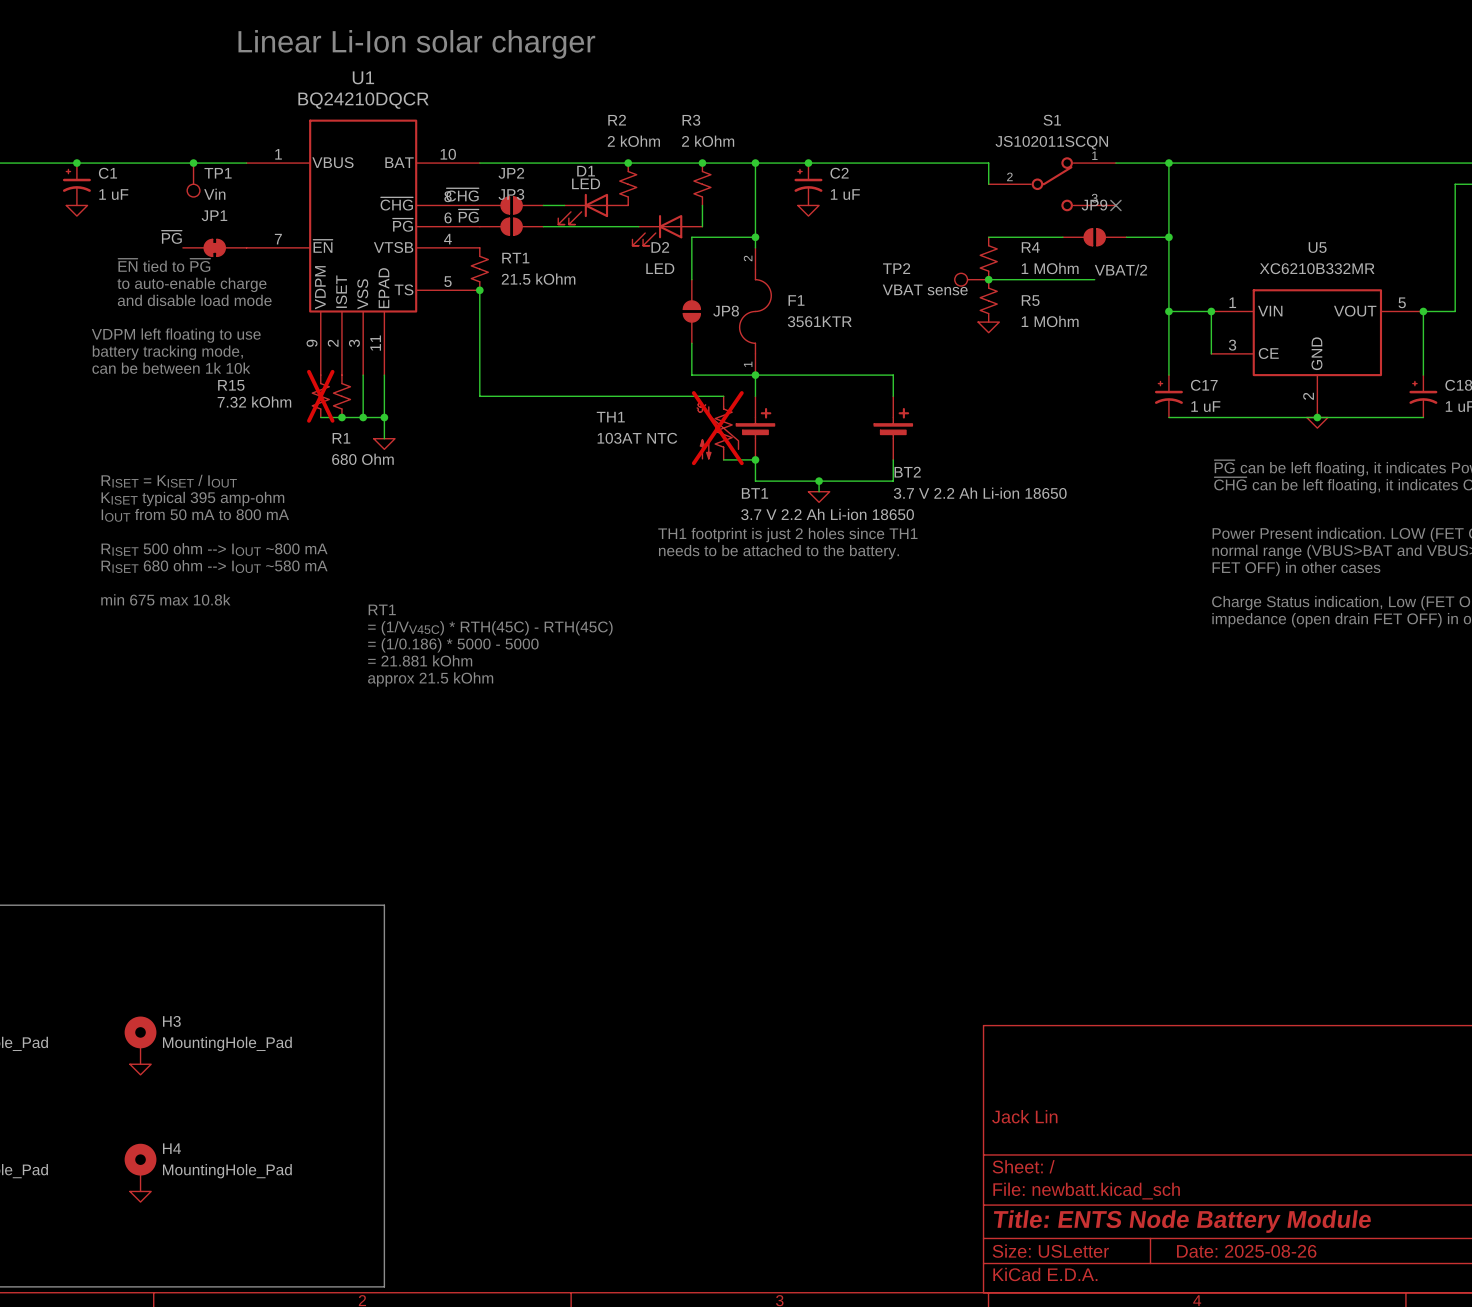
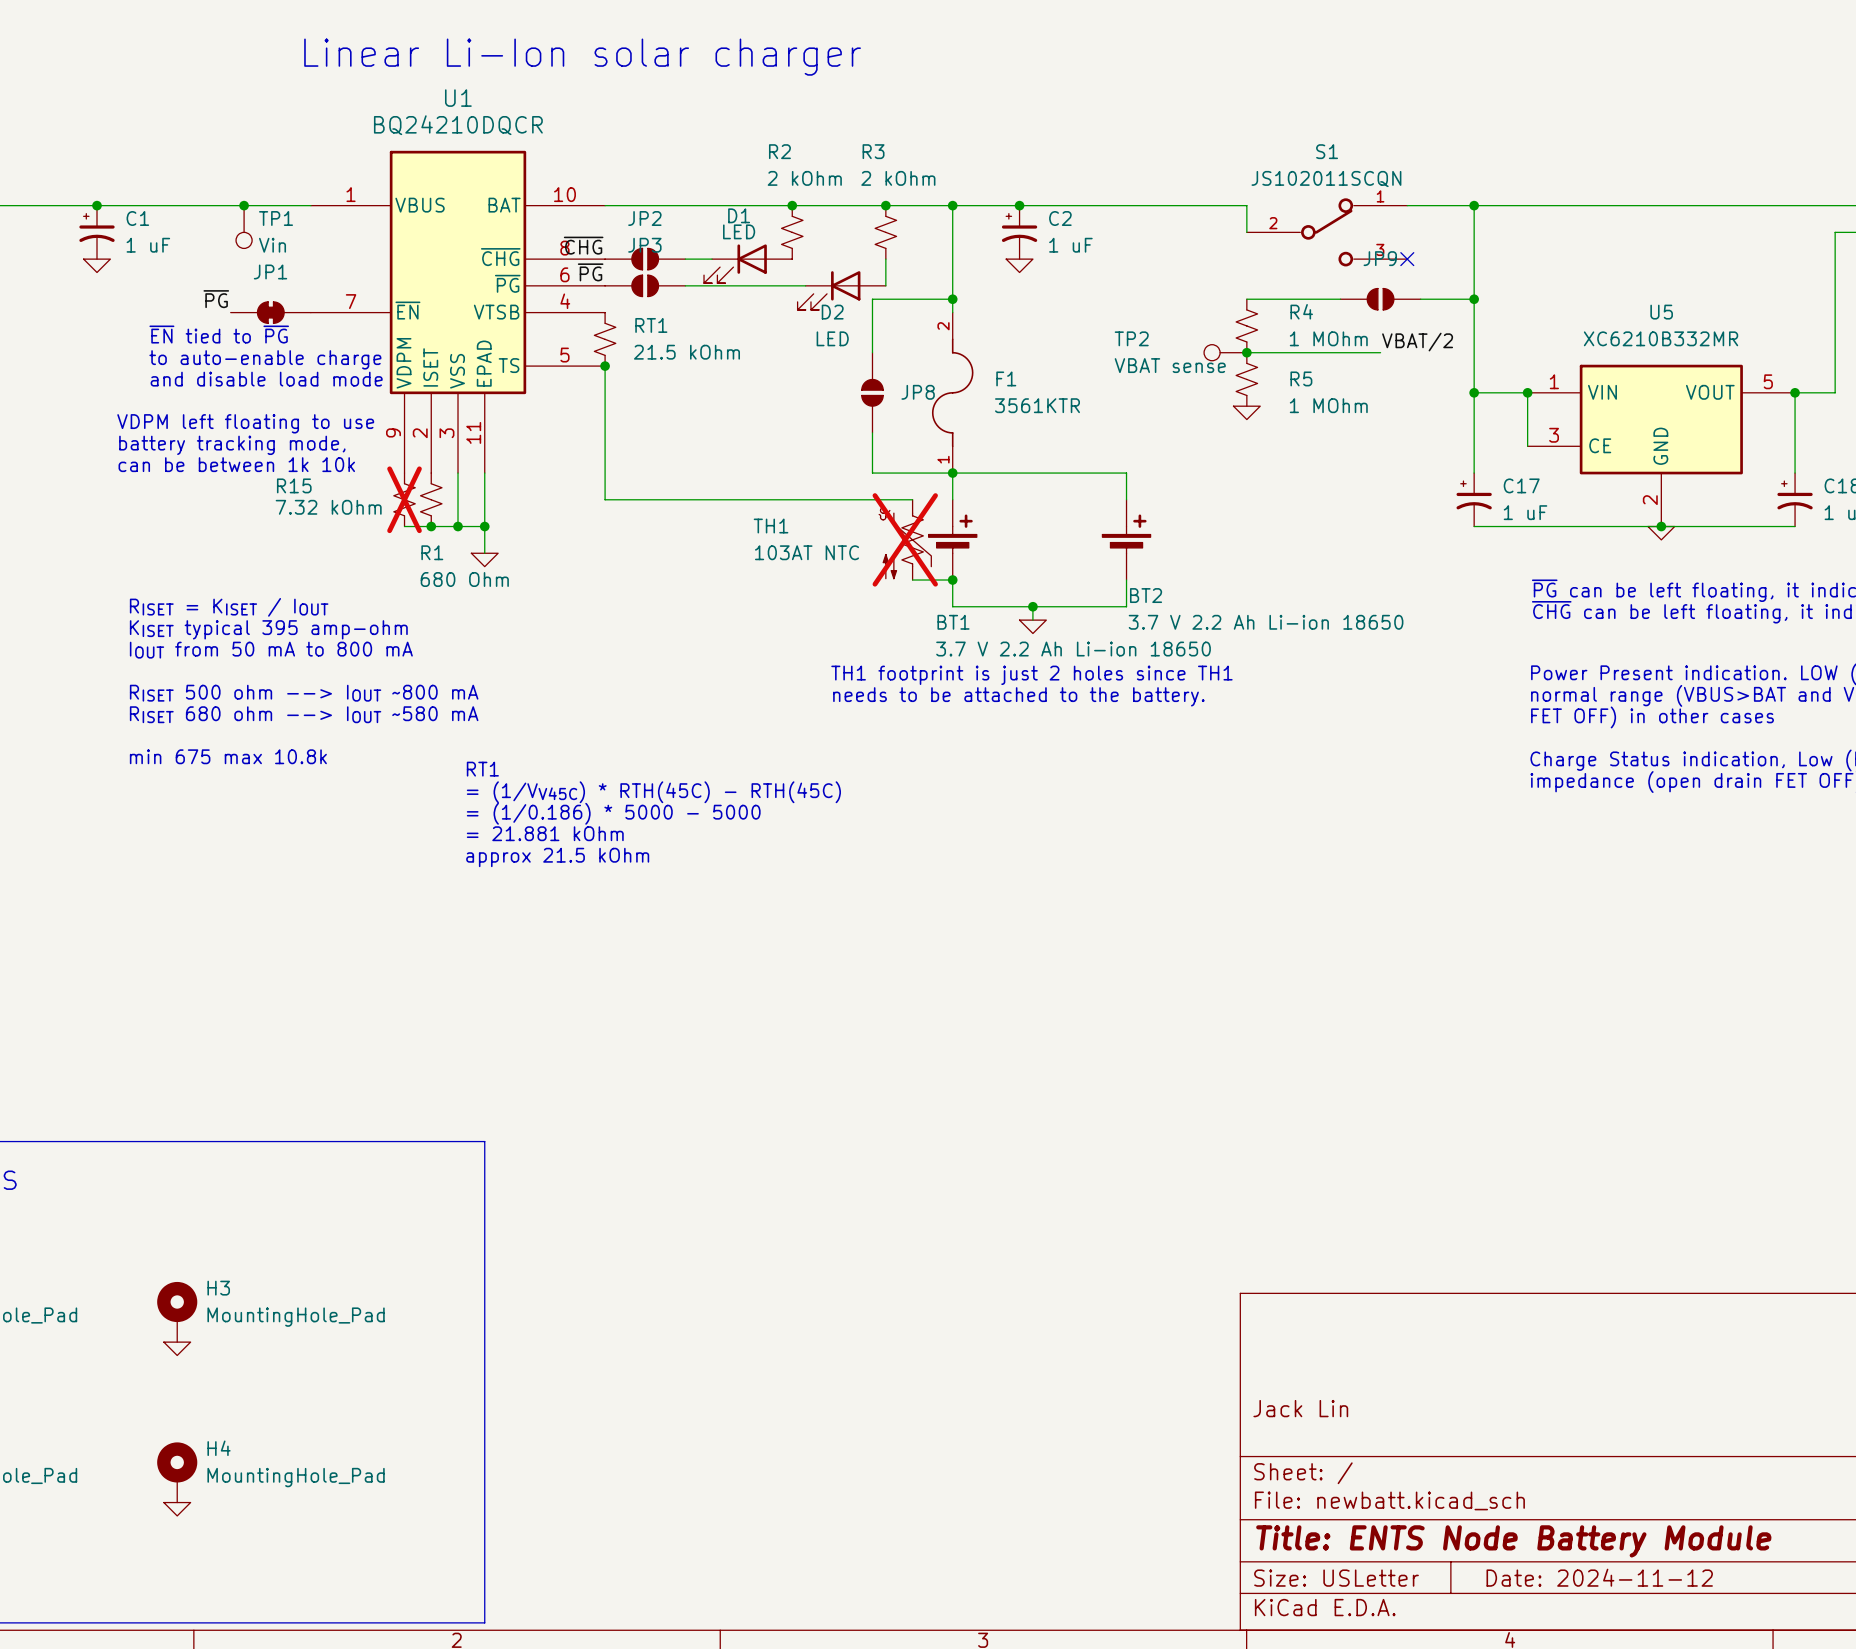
title block: Date: 2025-08-26 (1246, 1251) -> Date: 2024-11-12 (1599, 1577)

